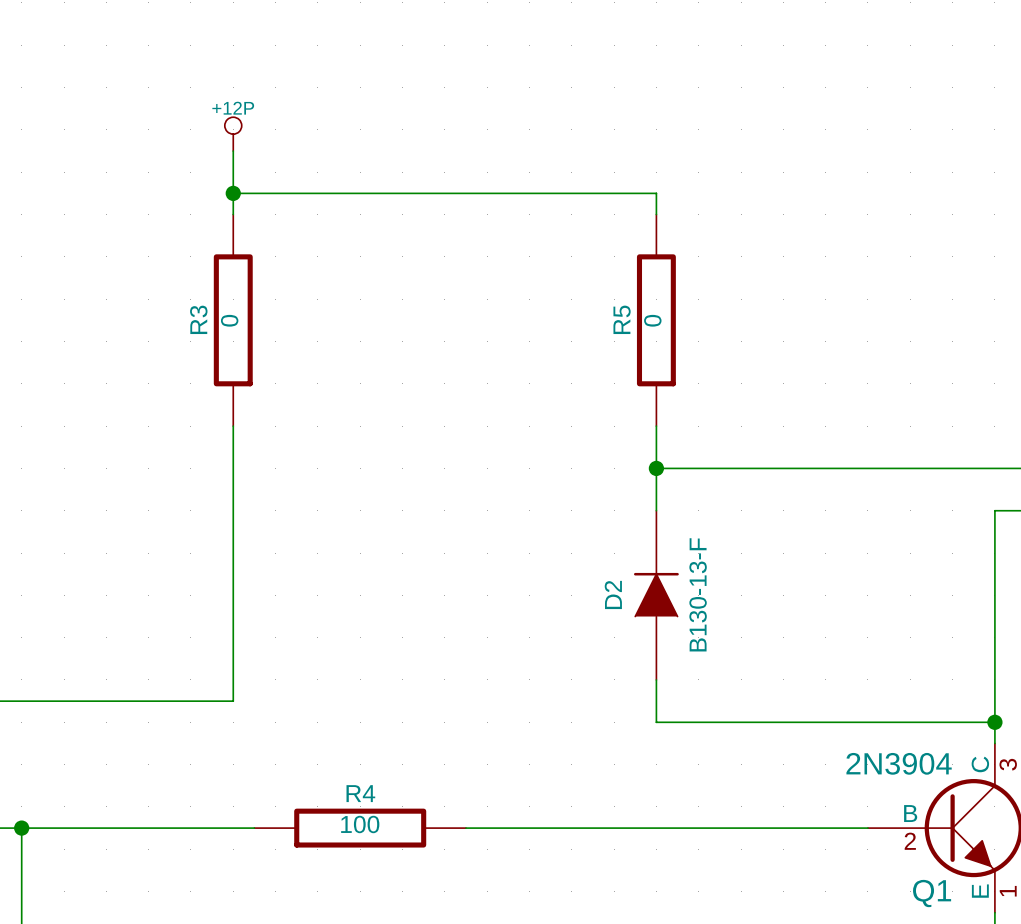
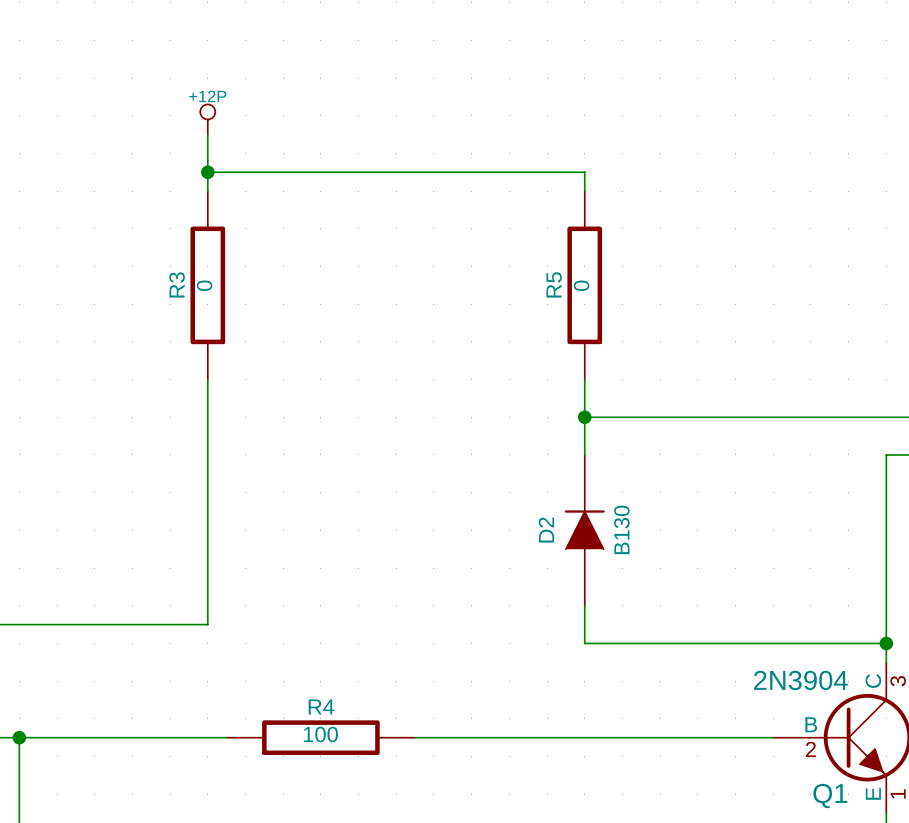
D2 value: B130-13-F (698, 594) -> B130 (621, 529)

